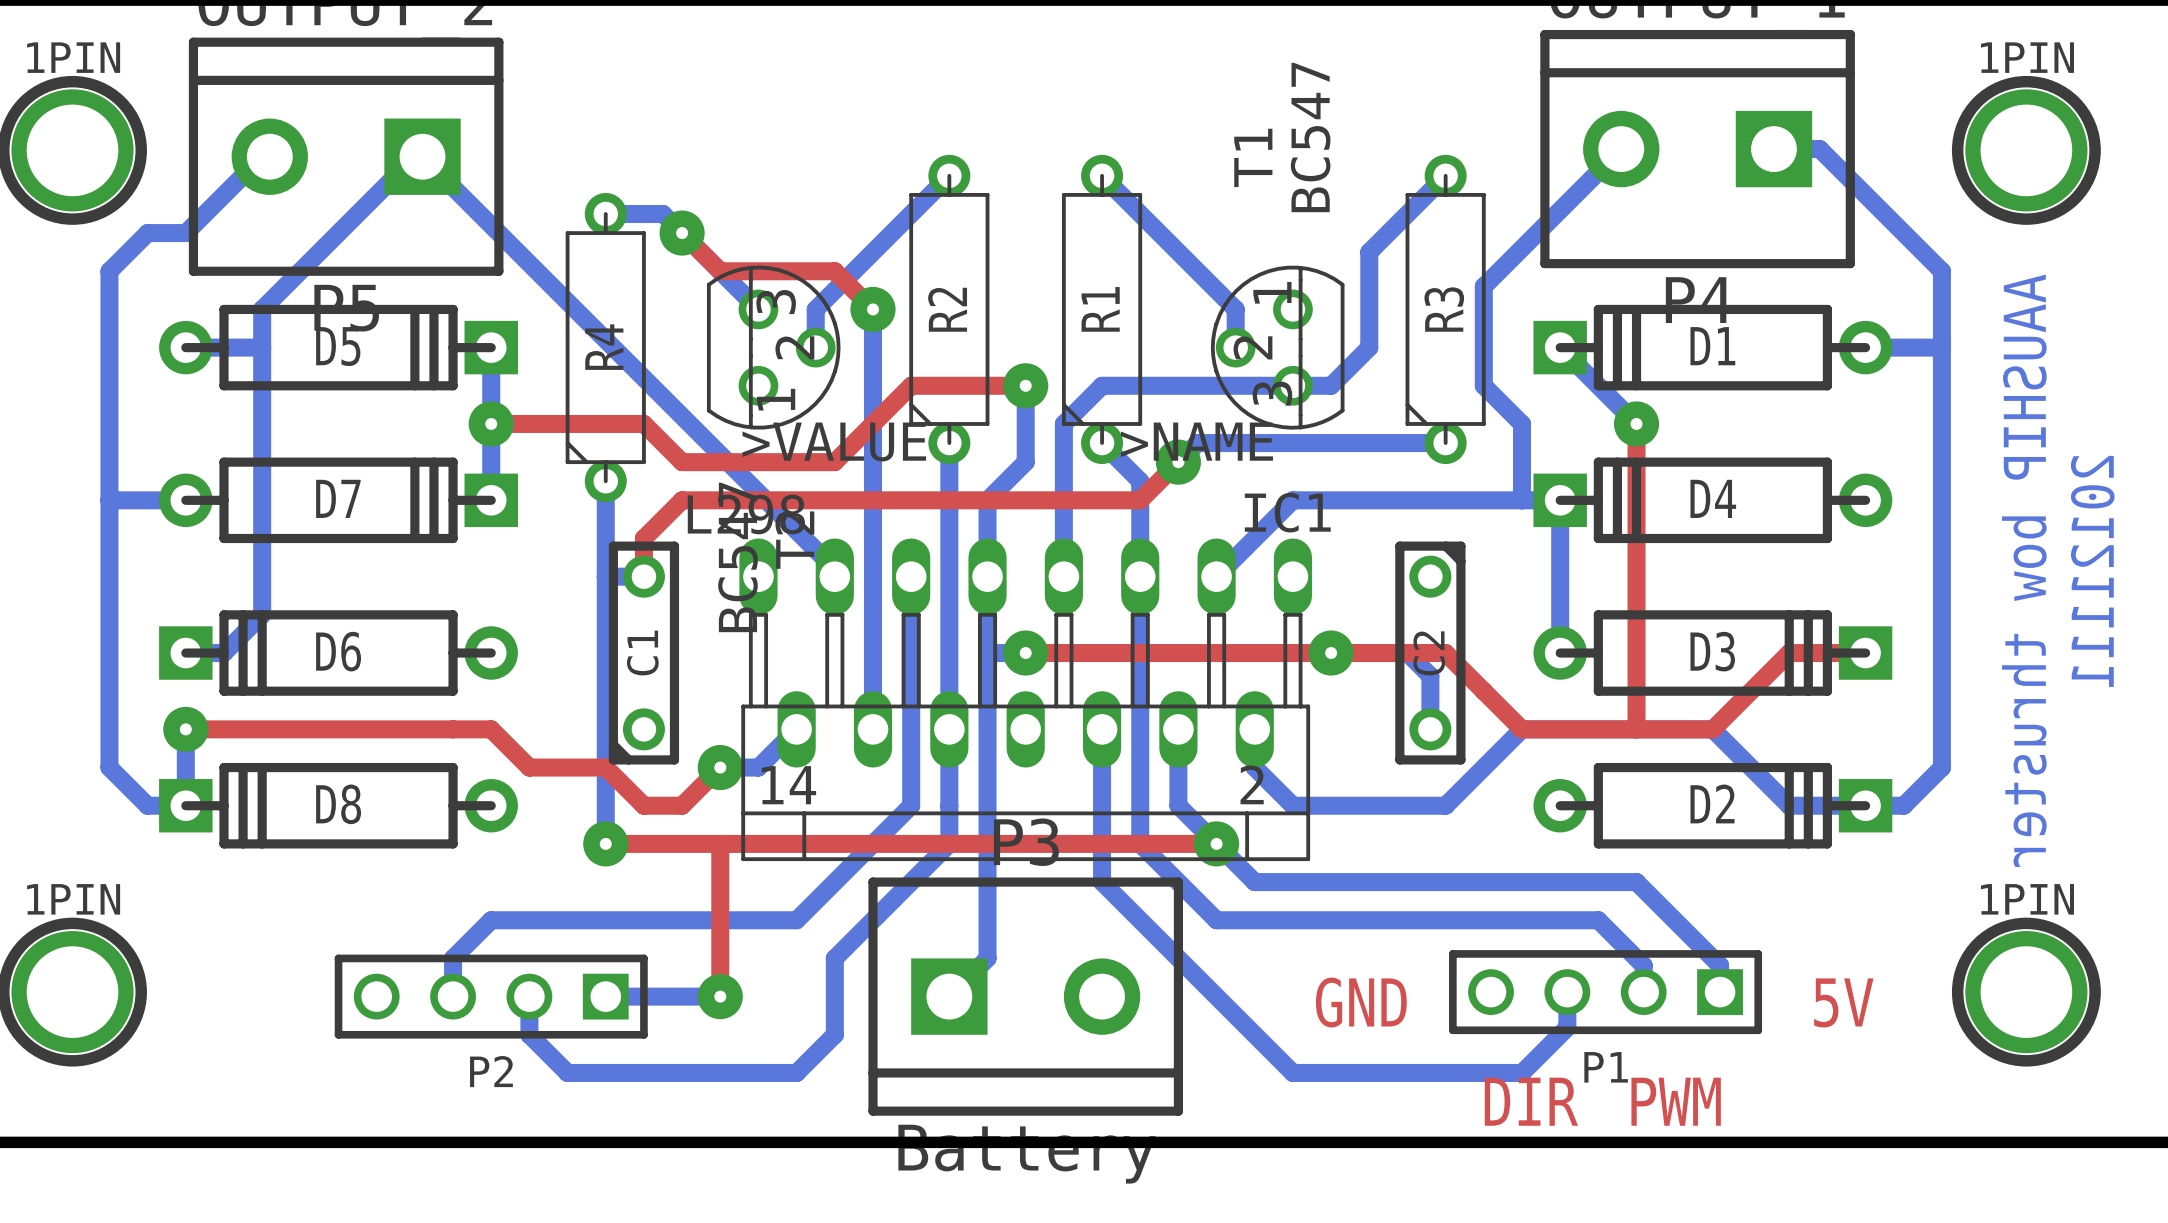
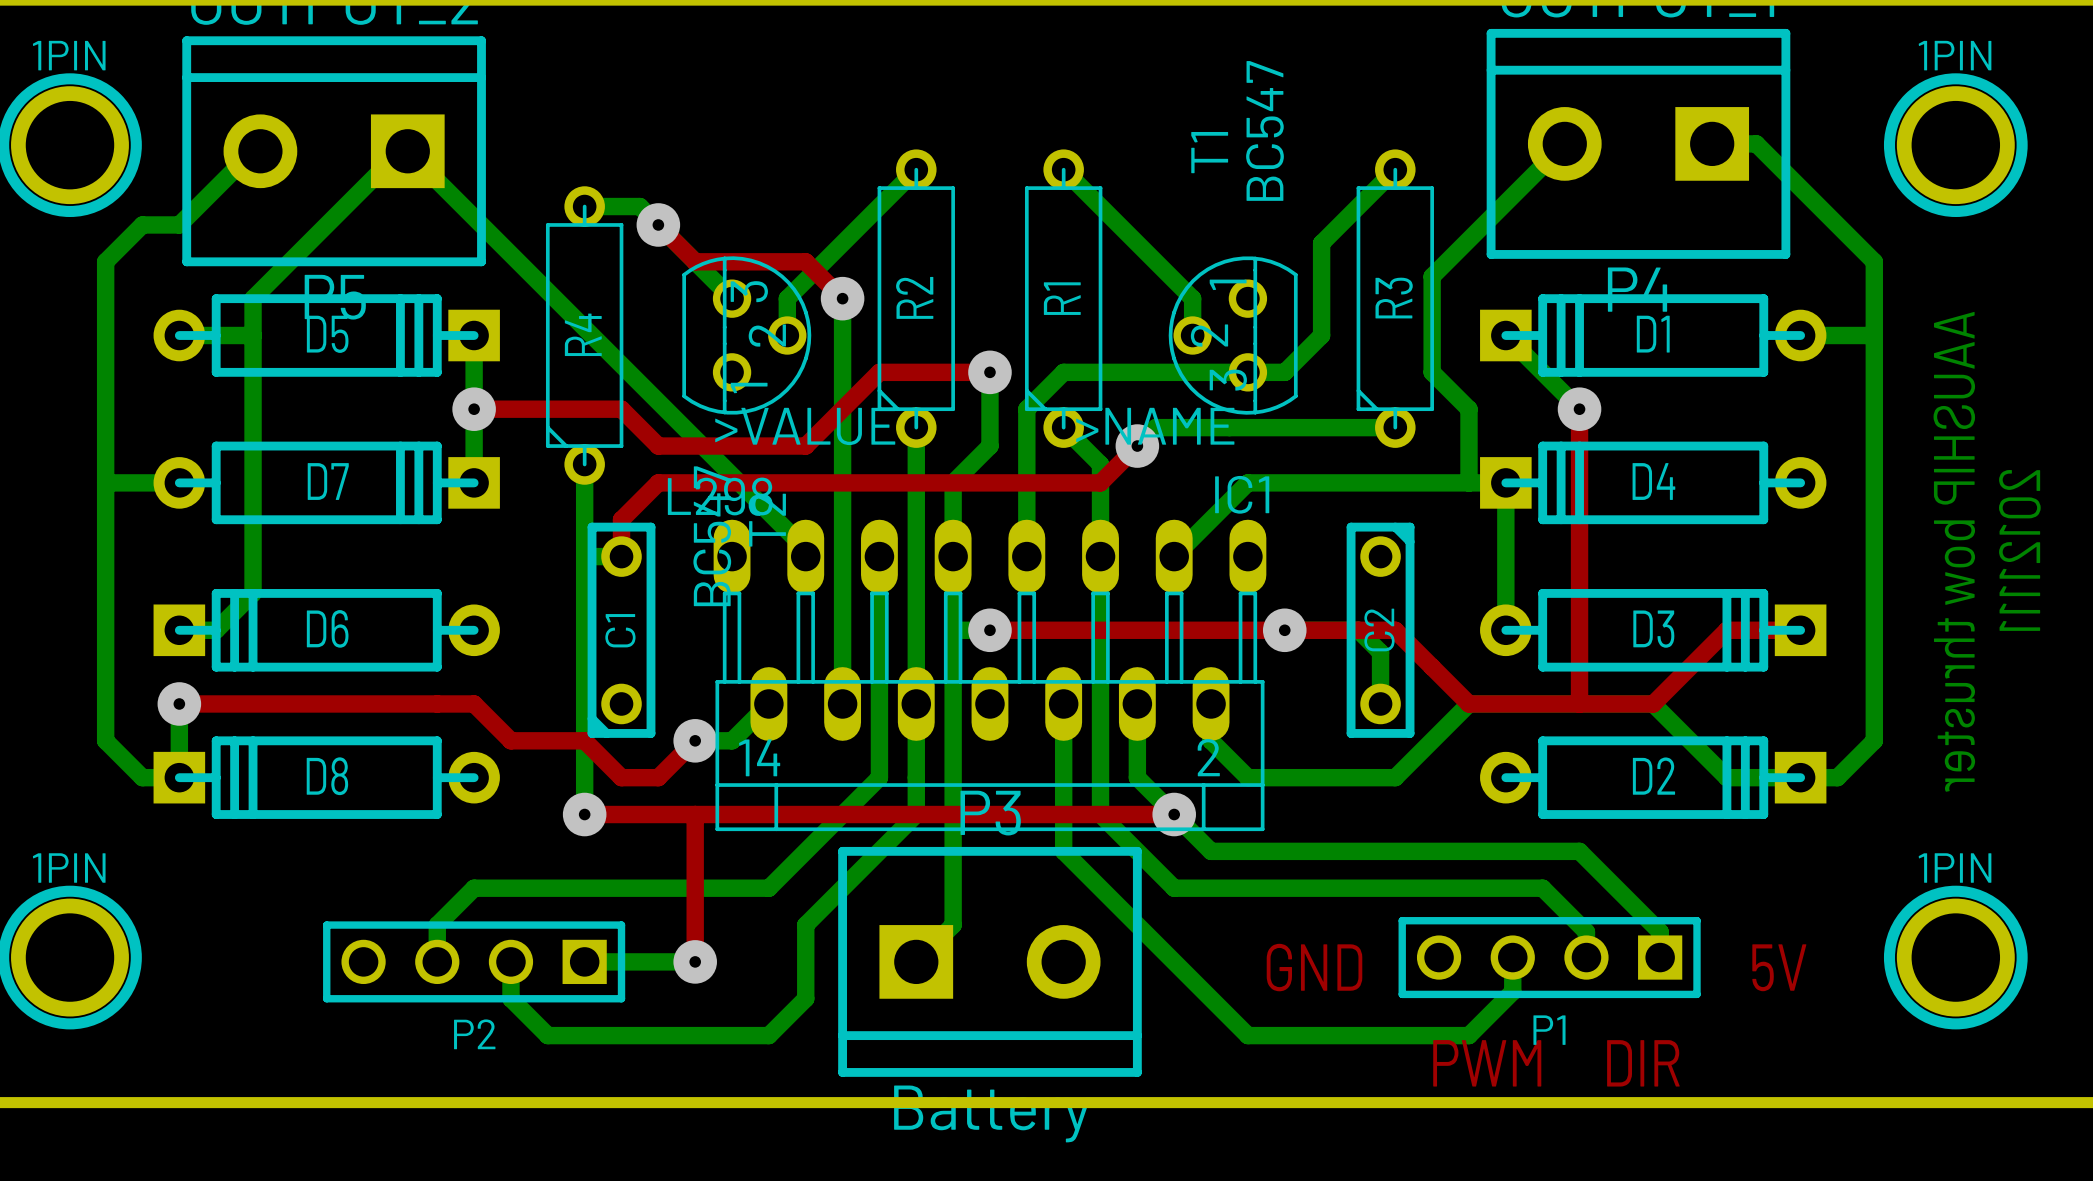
text position: DIR (1531, 1101) -> DIR (1643, 1063)
text position: PWM (1676, 1101) -> PWM (1487, 1063)

